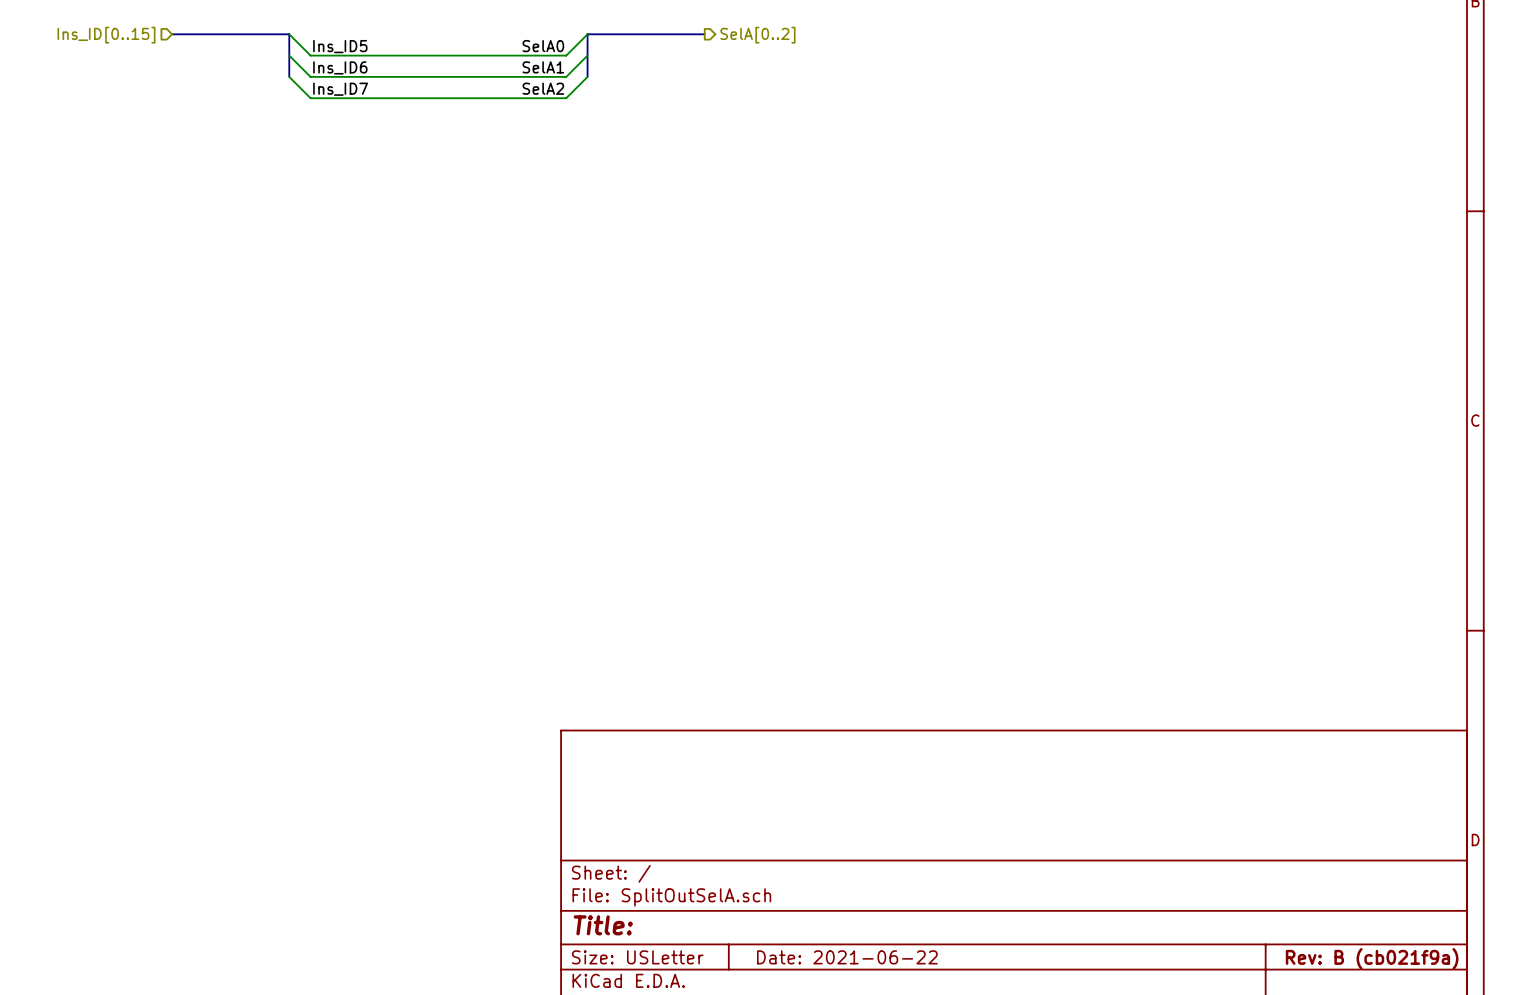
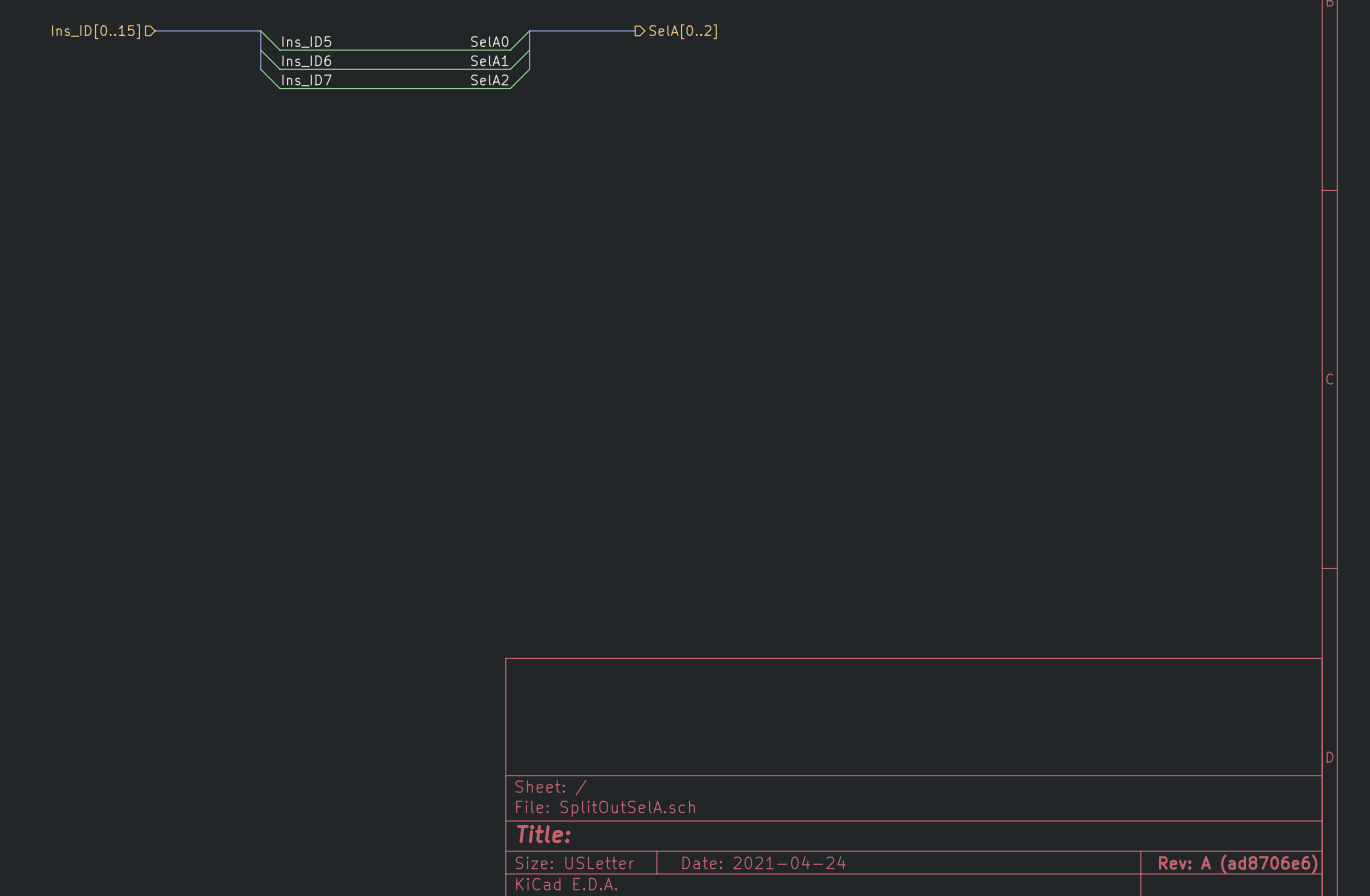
title block: Date: 2021-06-22 (847, 957) -> Date: 2021-04-24 (764, 862)
title block: Rev: B (cb021f9a) (1372, 958) -> Rev: A (ad8706e6) (1238, 864)

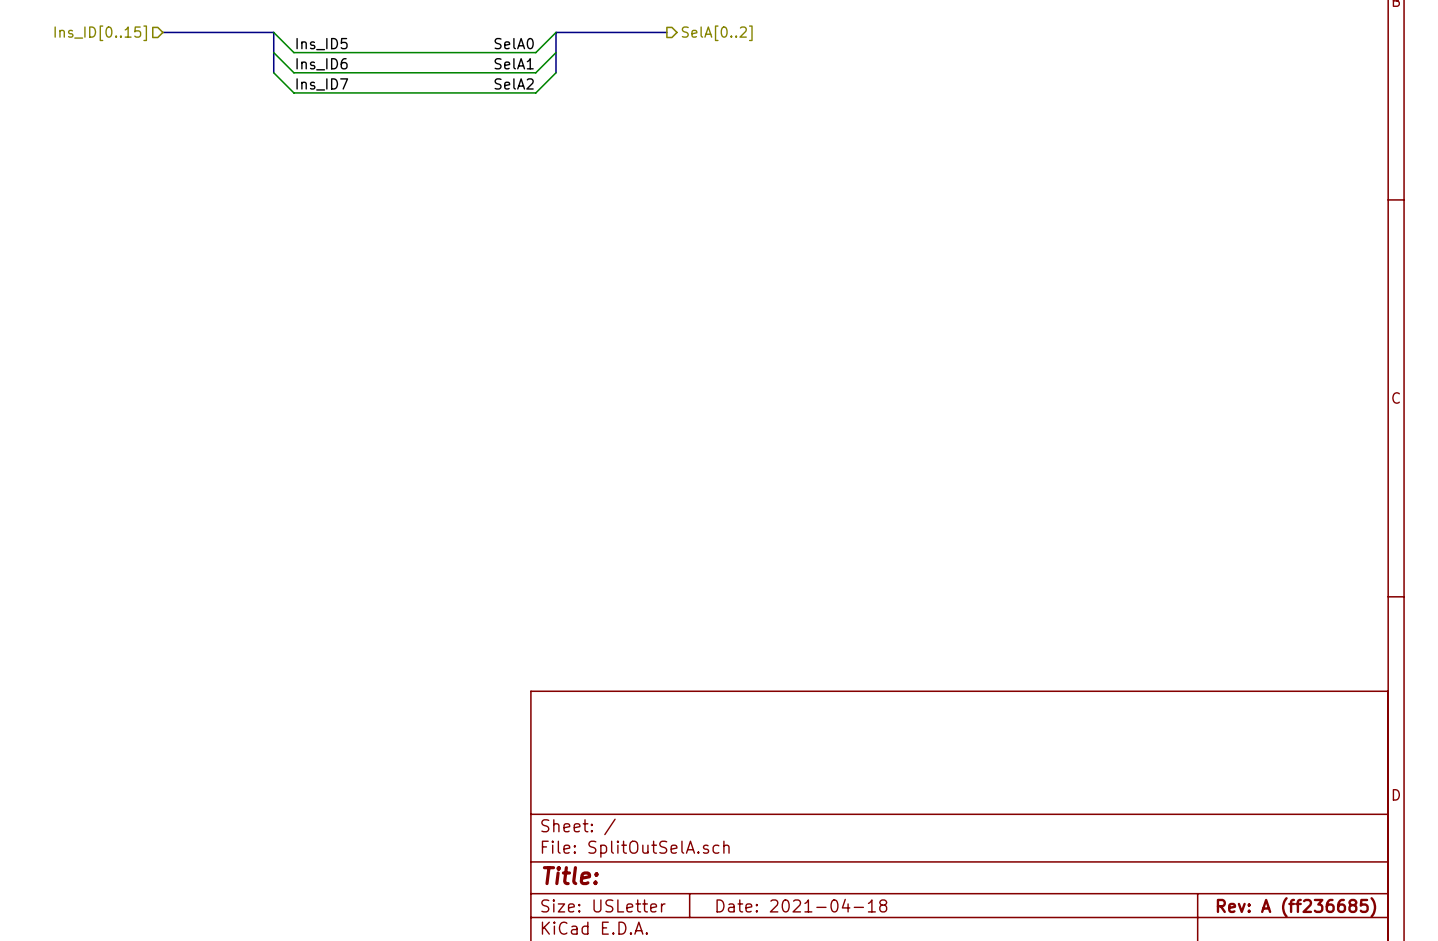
title block: Date: 2021-04-24 (764, 862) -> Date: 2021-04-18 (801, 905)
title block: Rev: A (ad8706e6) (1238, 864) -> Rev: A (ff236685) (1296, 907)

